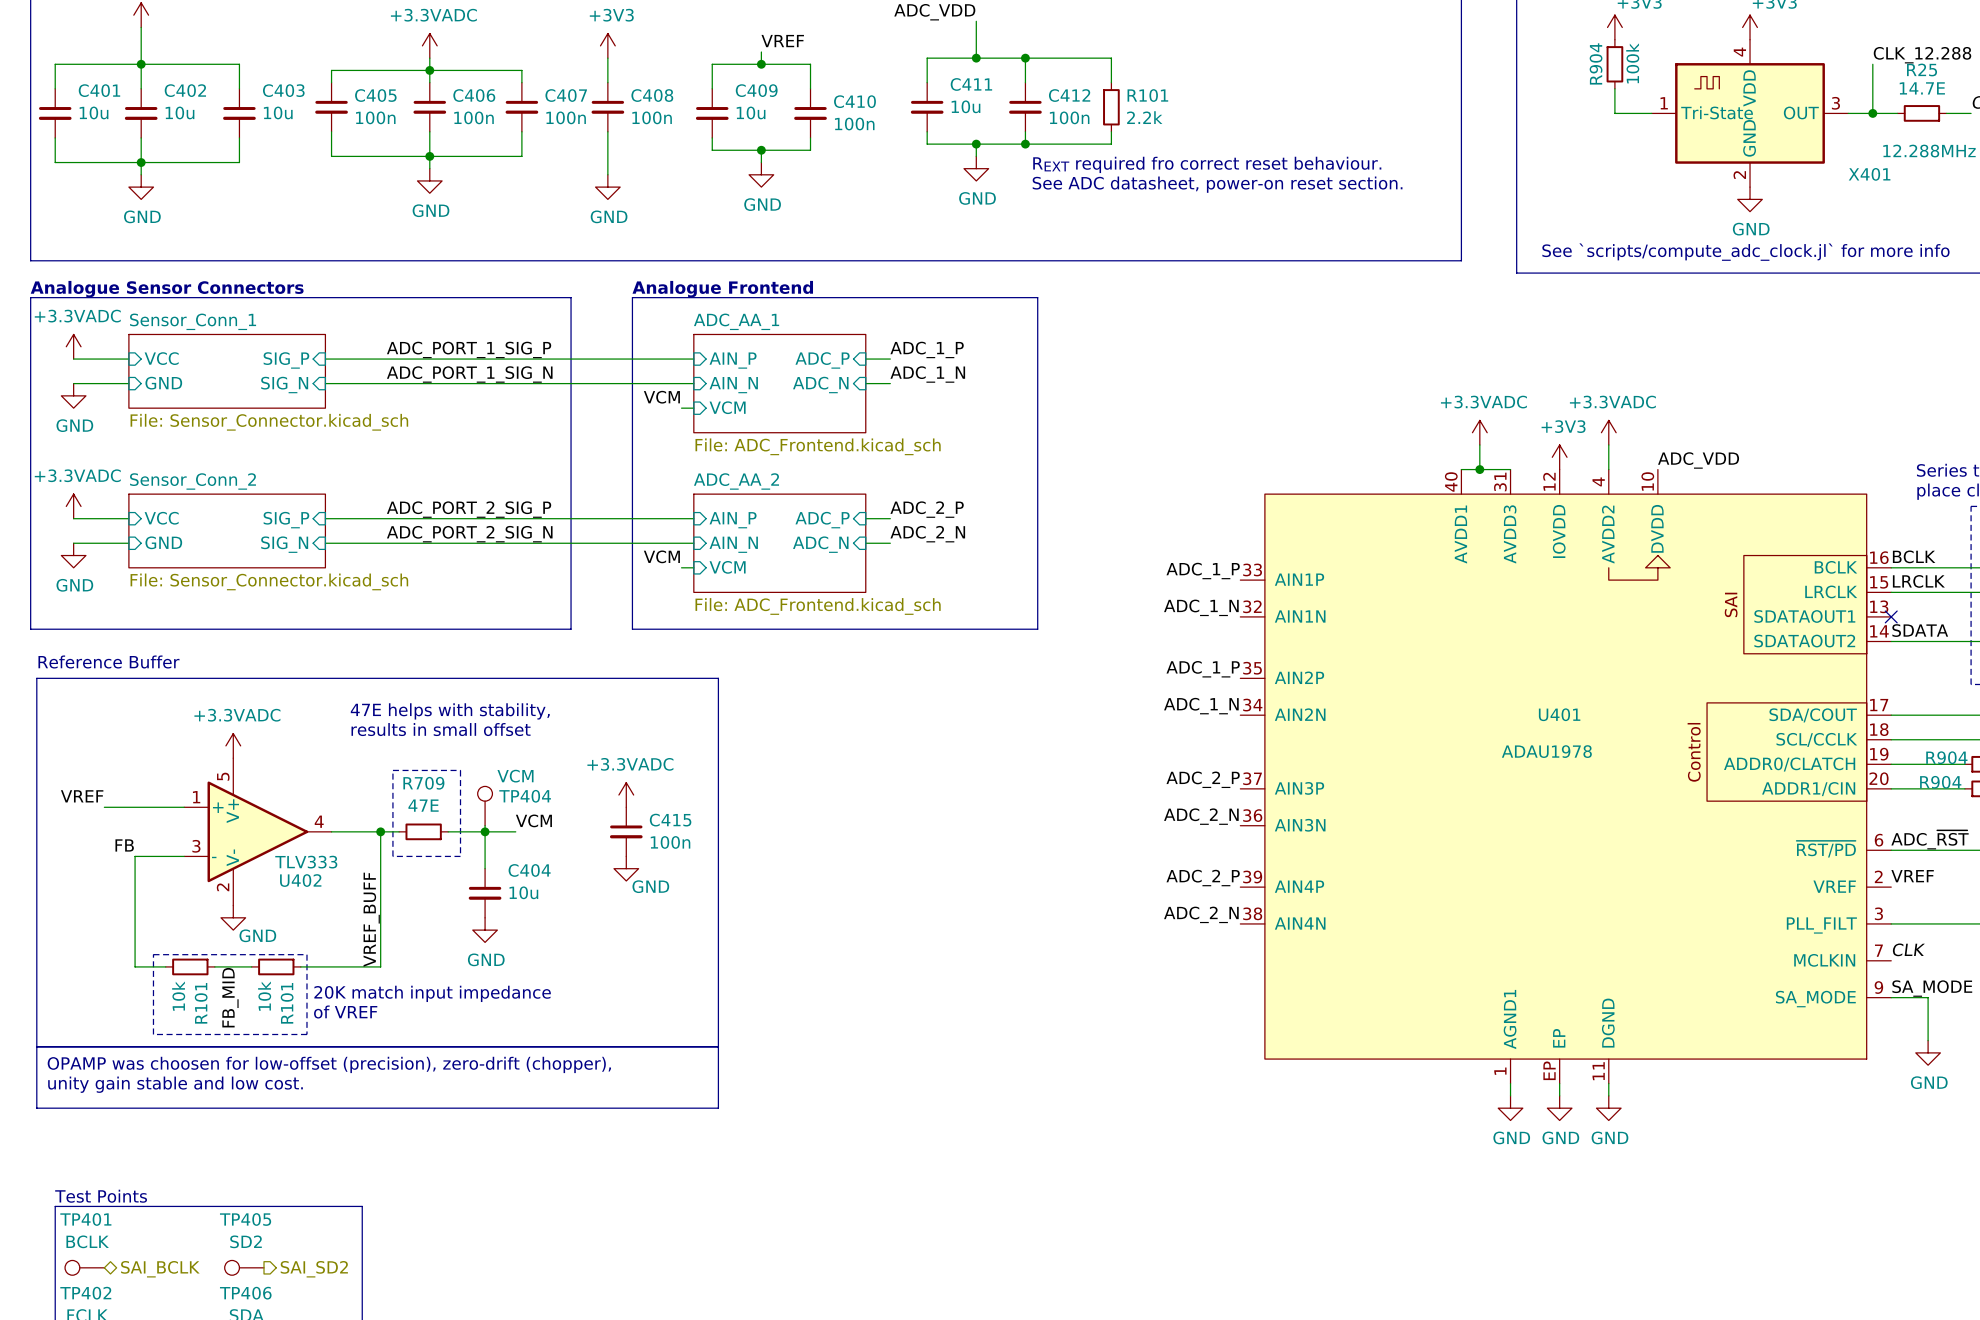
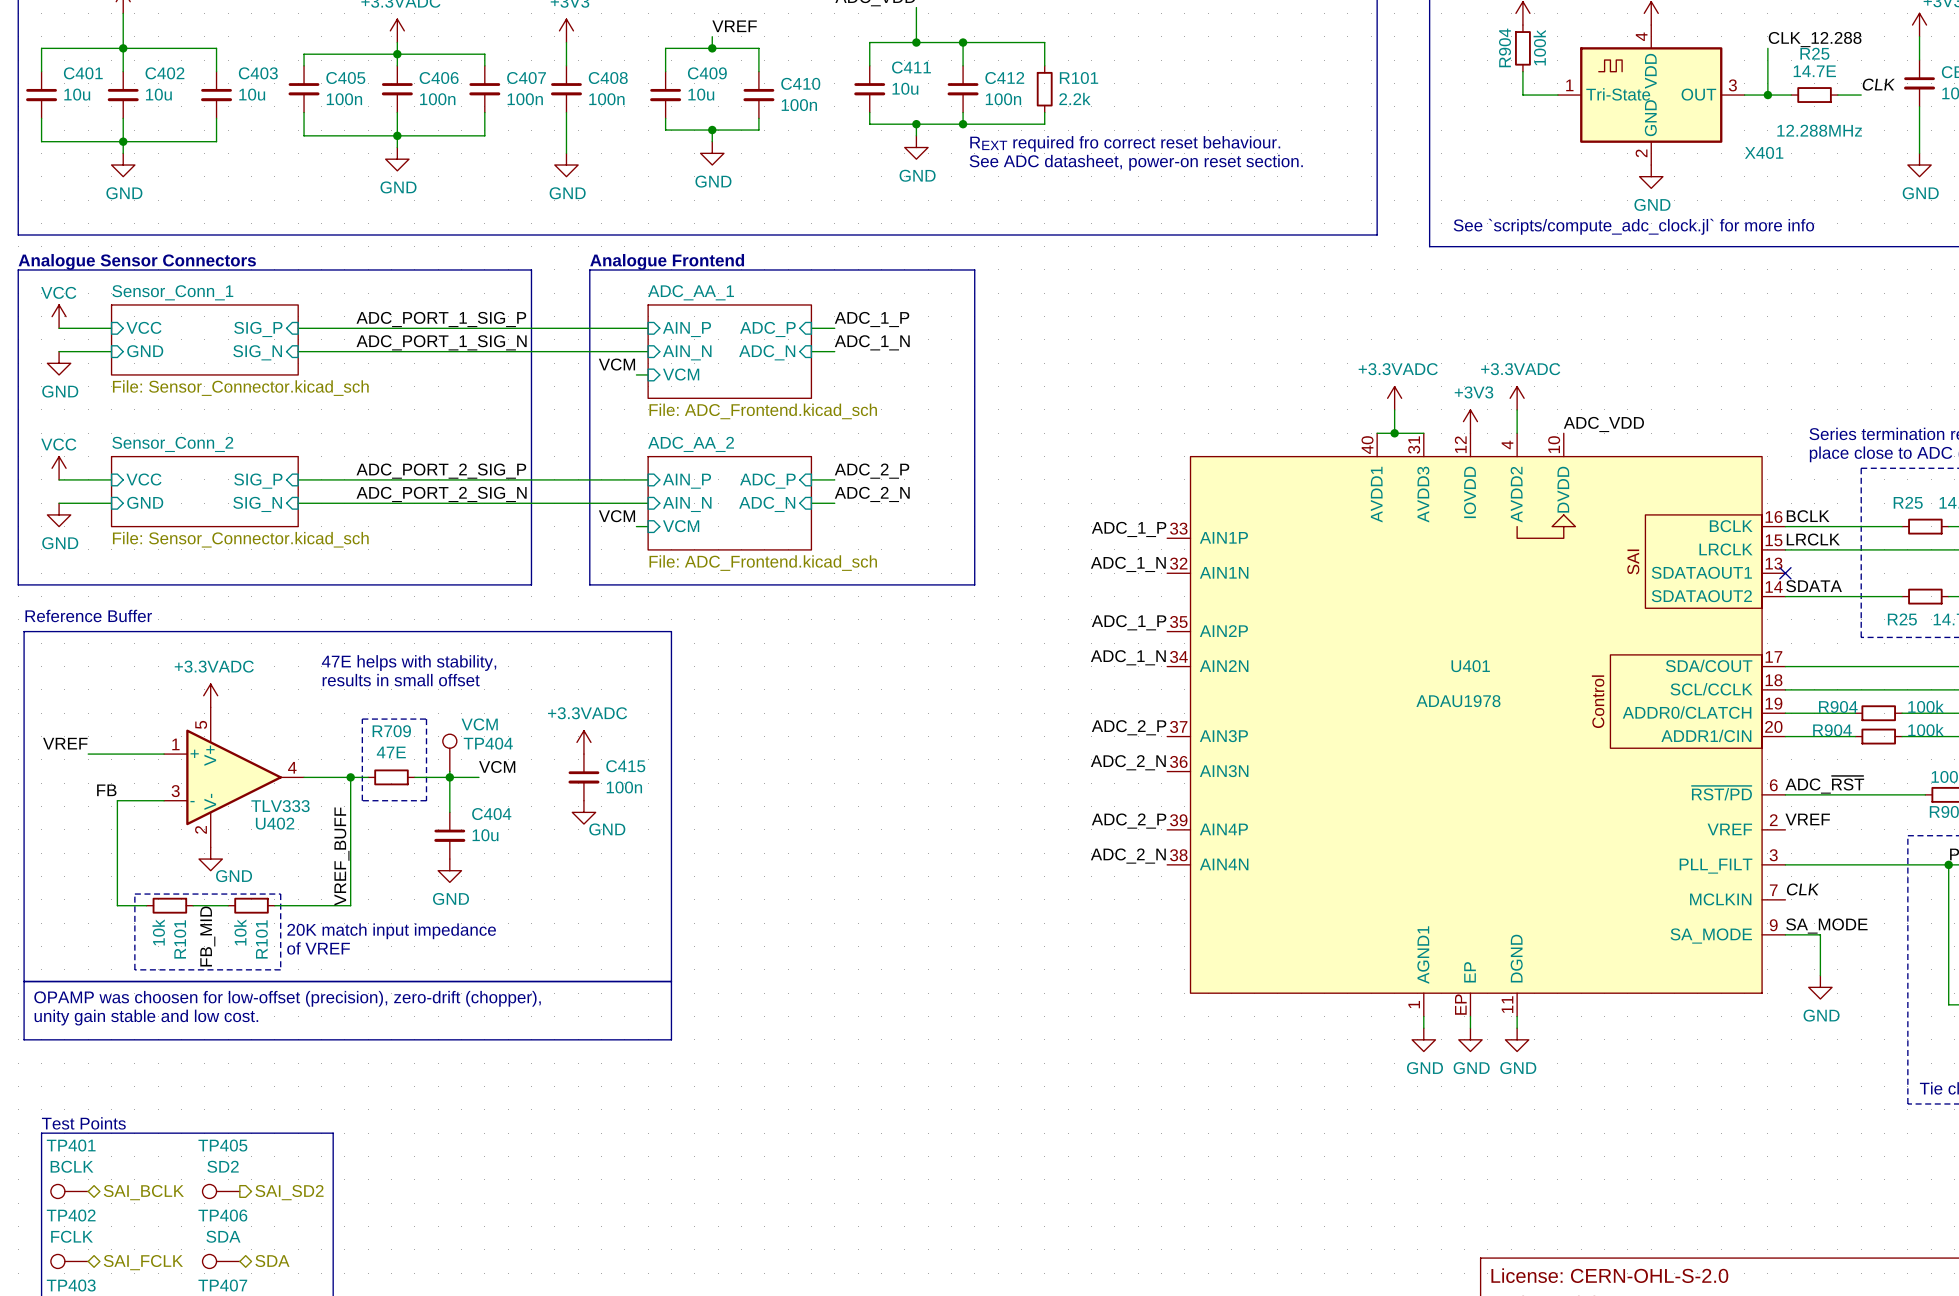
power symbol: +3.3VADC (73, 346) -> VCC (59, 316)
power symbol: +3.3VADC (73, 506) -> VCC (59, 468)

